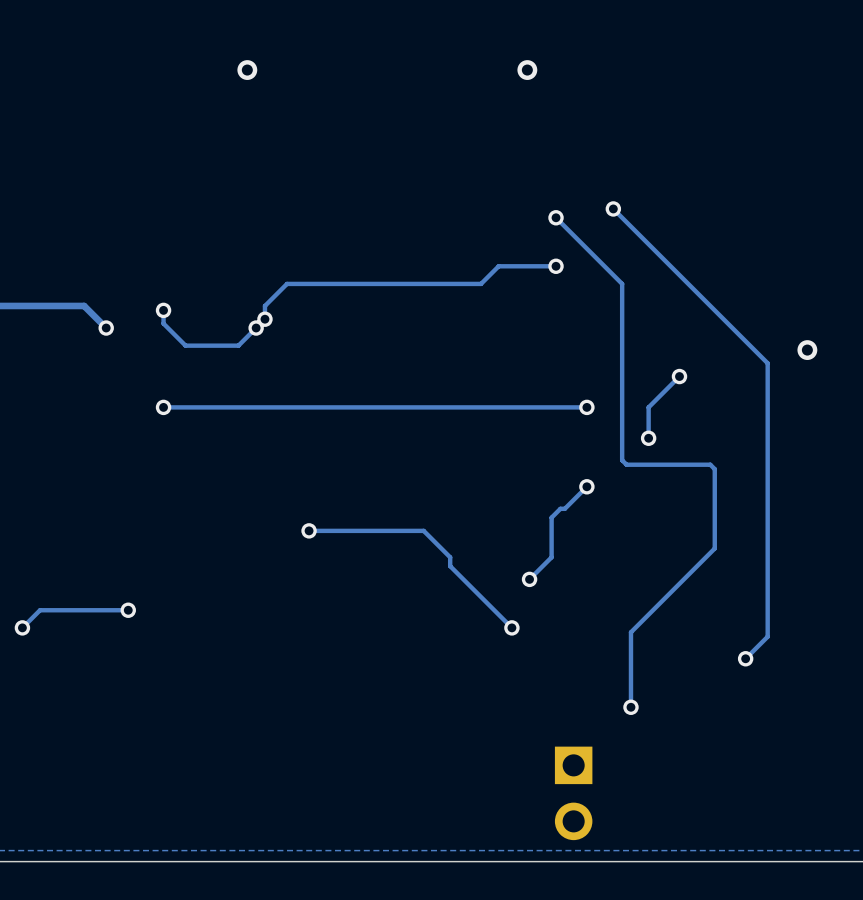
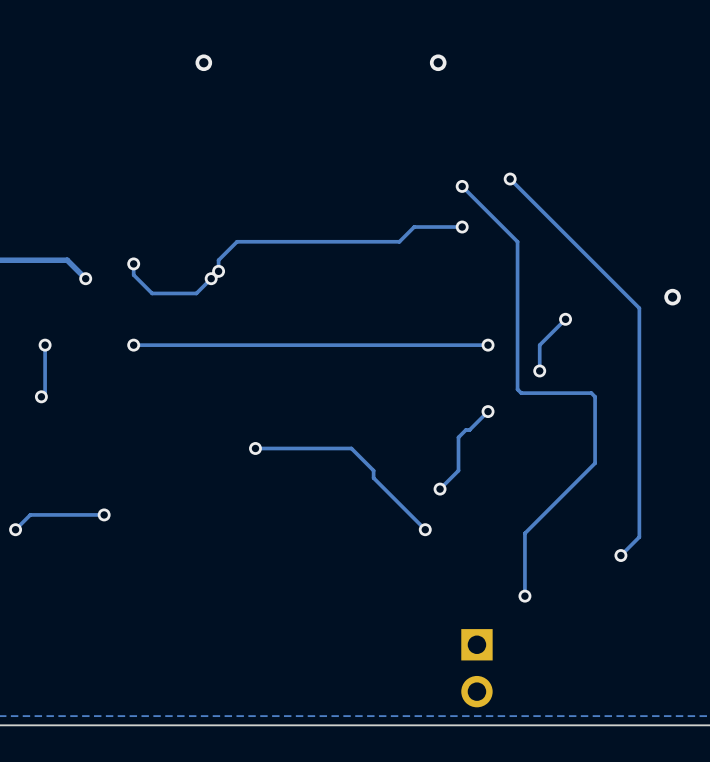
track: none -> (45, 345) (45, 393) (41, 396)
via: none -> (45, 345)
via: none -> (41, 396)

